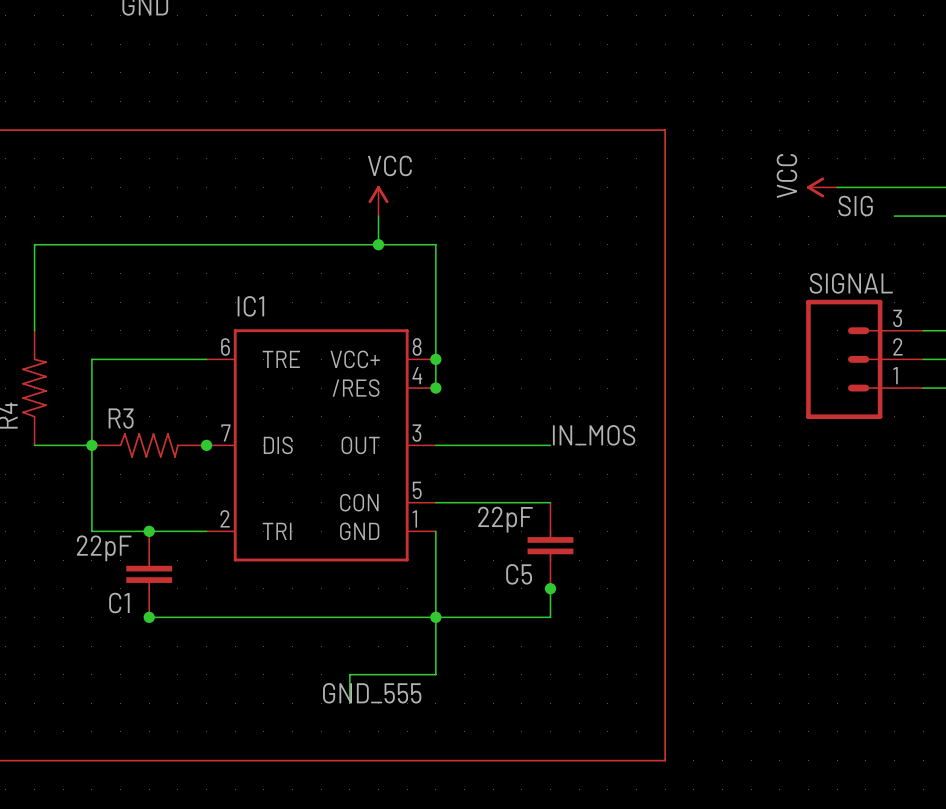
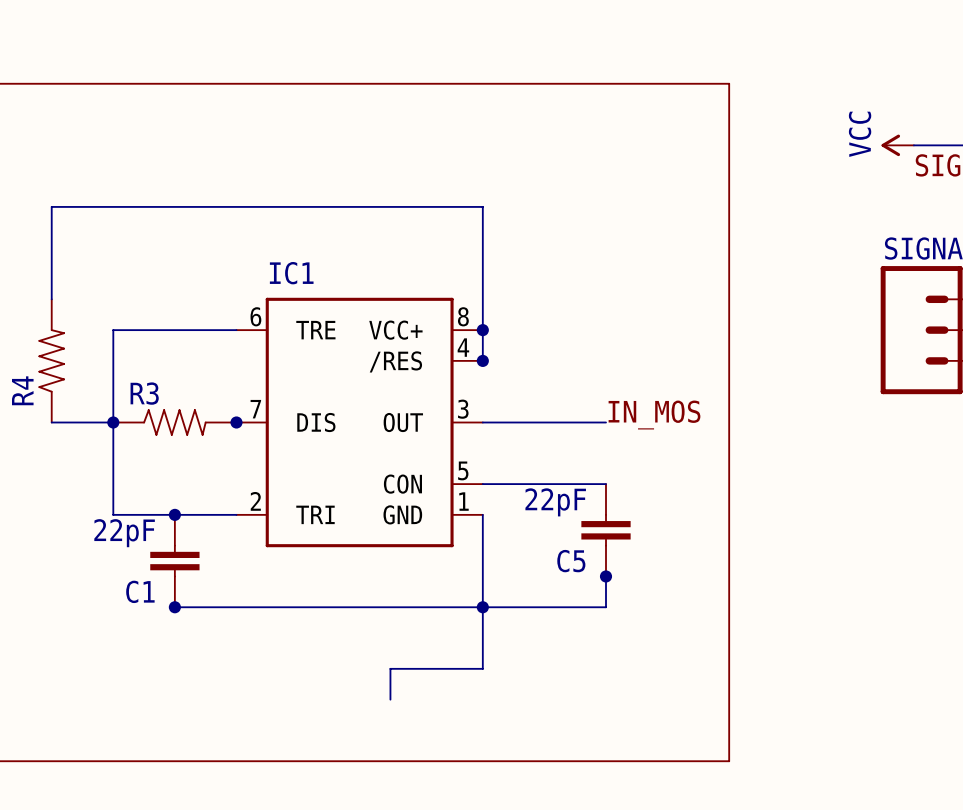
power symbol: VCC (378, 201) -> none
wire: (378, 216) (378, 244) -> none
junction: (378, 244) -> none
label: GND_555 (372, 693) -> none

